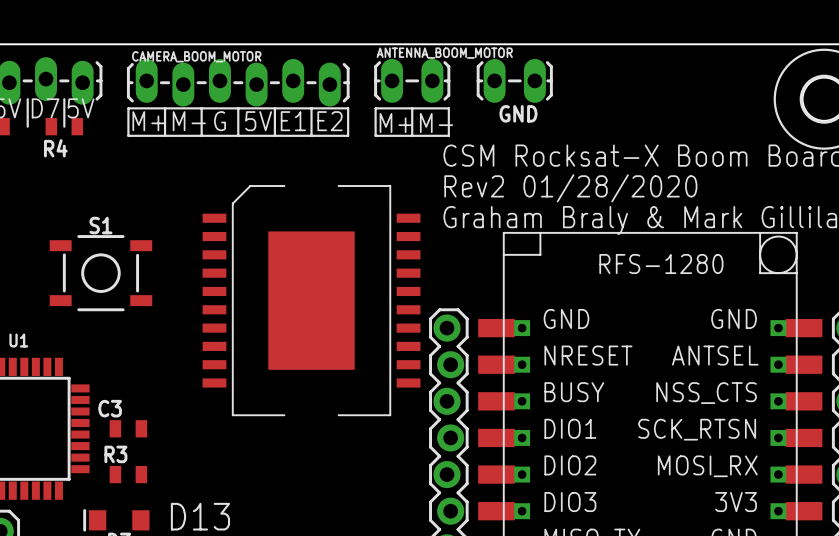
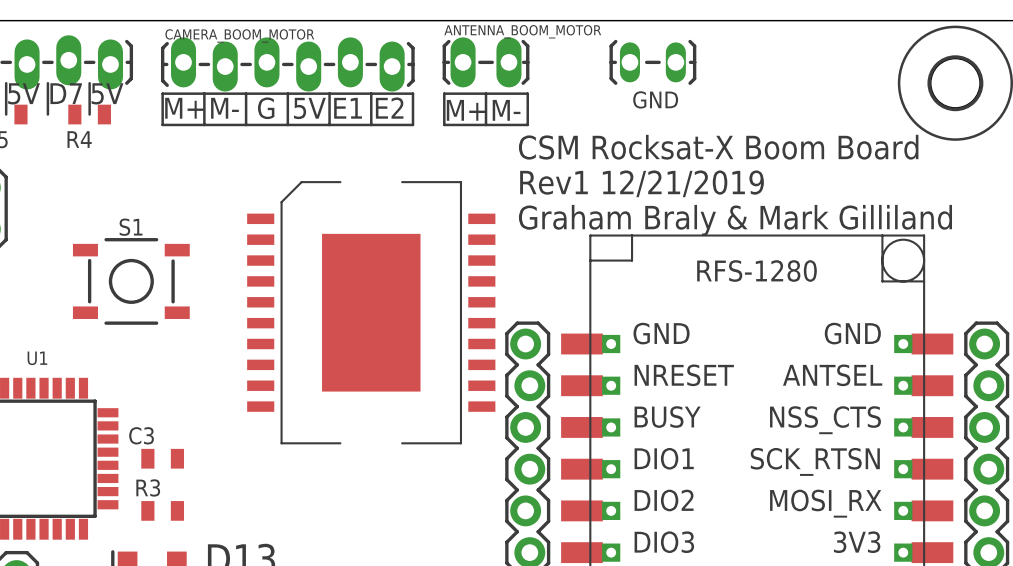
GND: (514, 80) -> none
GND: none -> (652, 62)
text: Rev2 01/28/2020 (570, 188) -> Rev1 12/21/2019 (642, 183)

